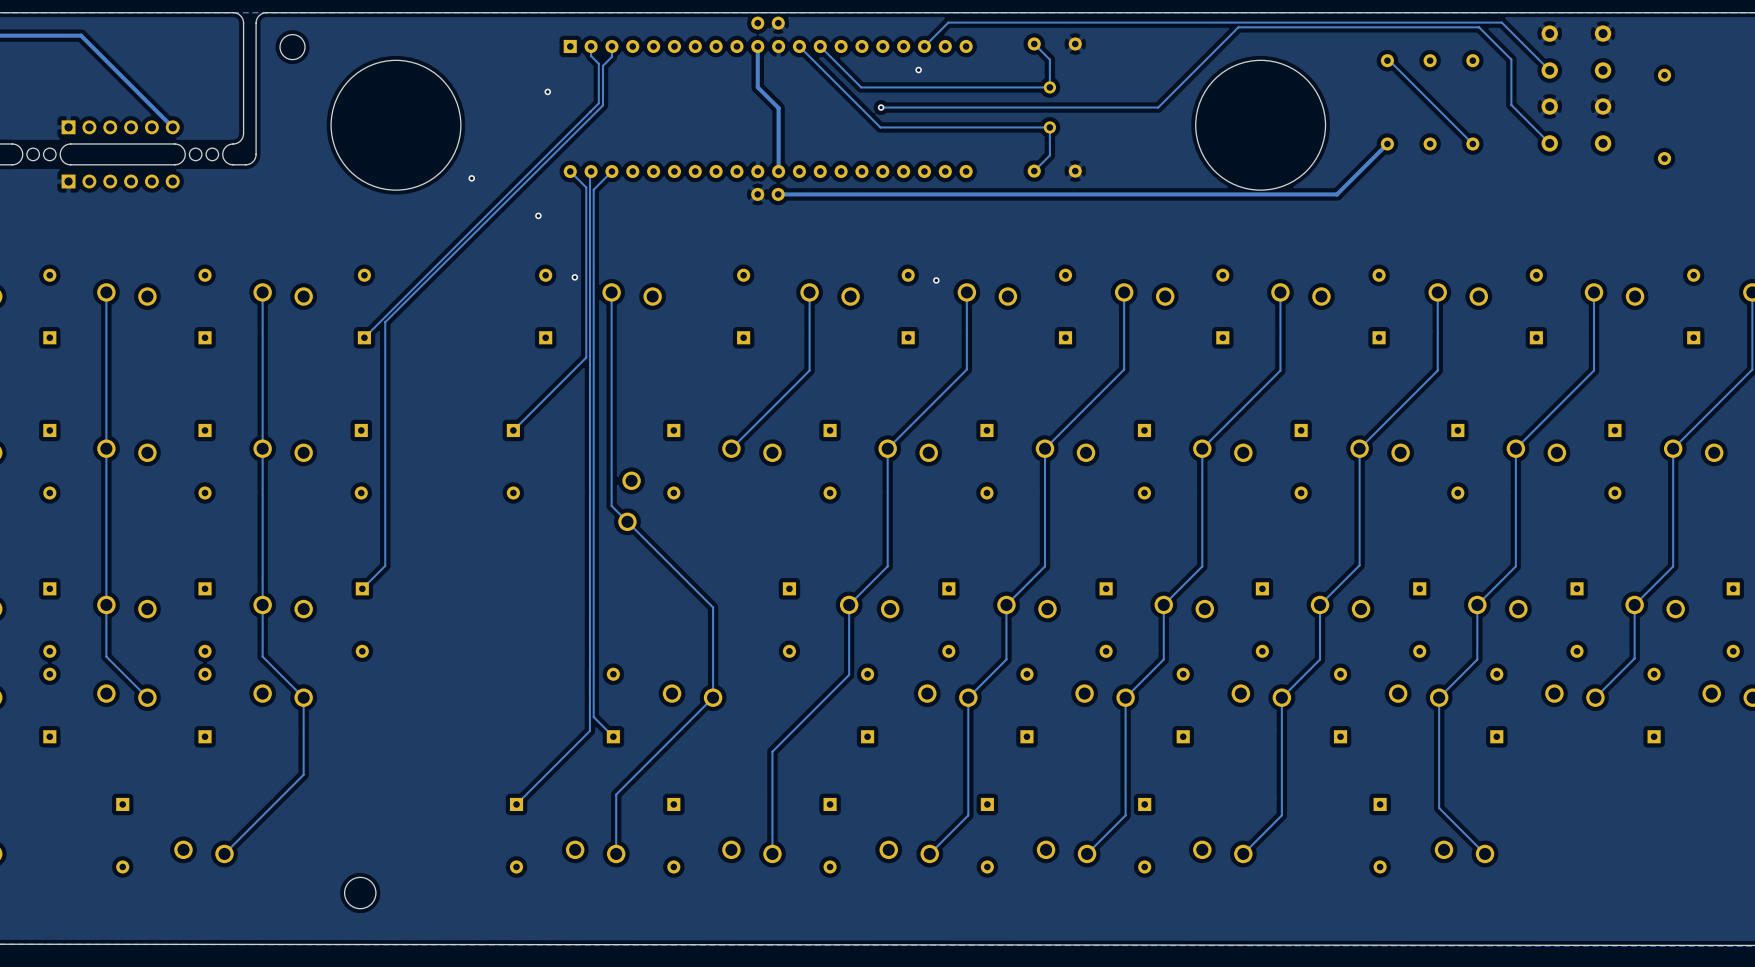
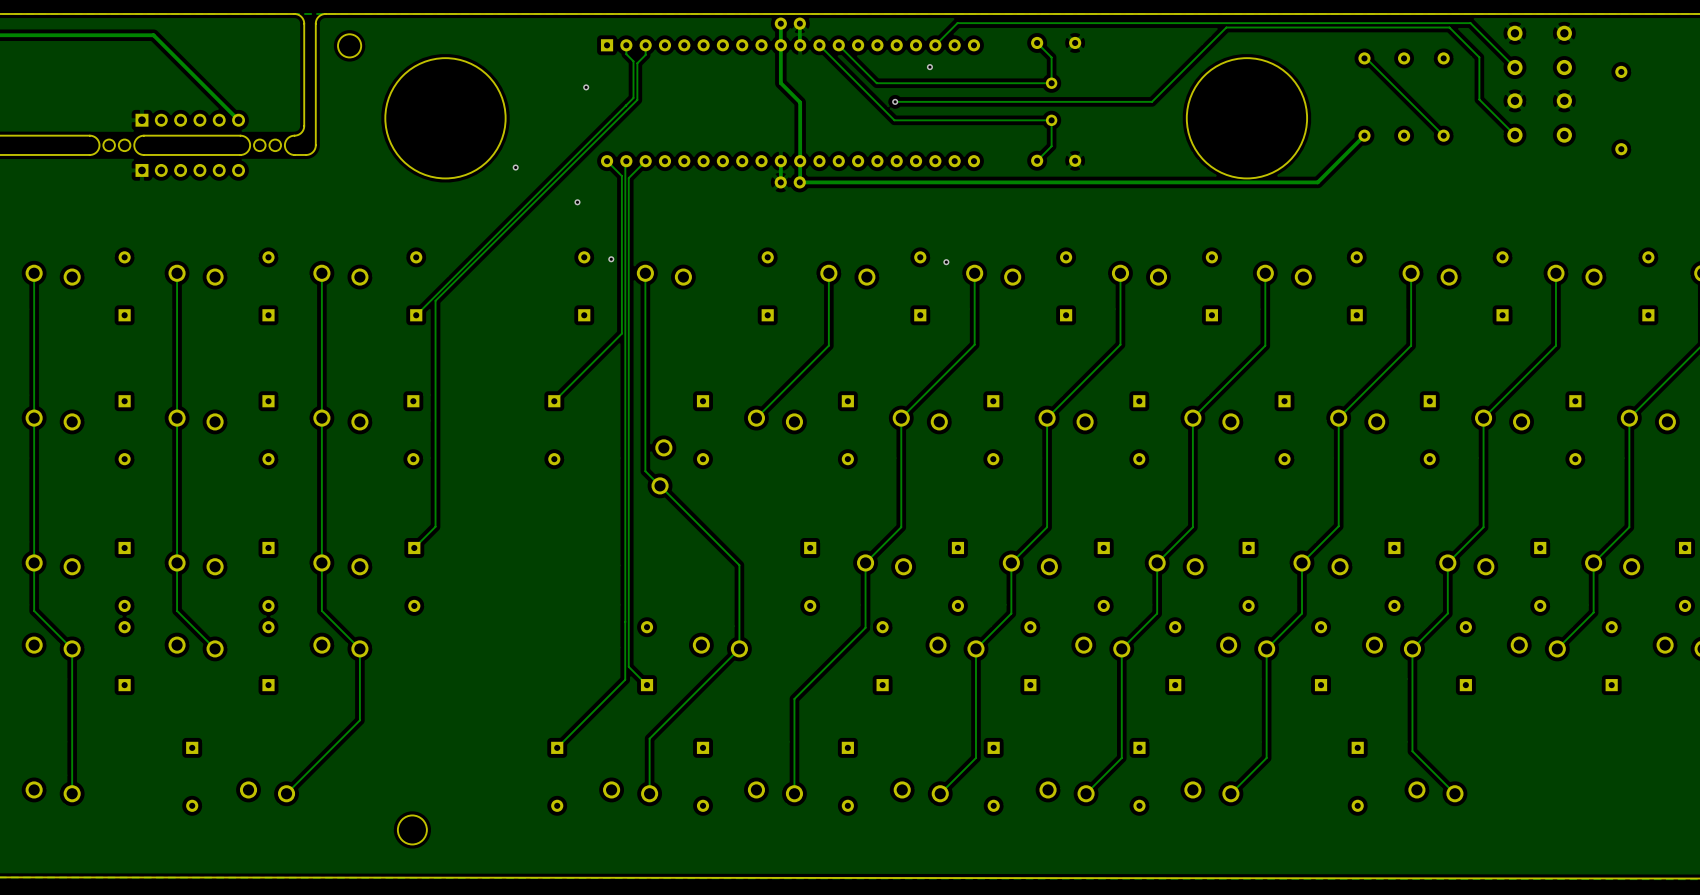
track: none -> (780, 23) (780, 45)
track: none -> (799, 23) (799, 44)
track: none -> (780, 161) (780, 182)
track: none -> (800, 161) (800, 182)

